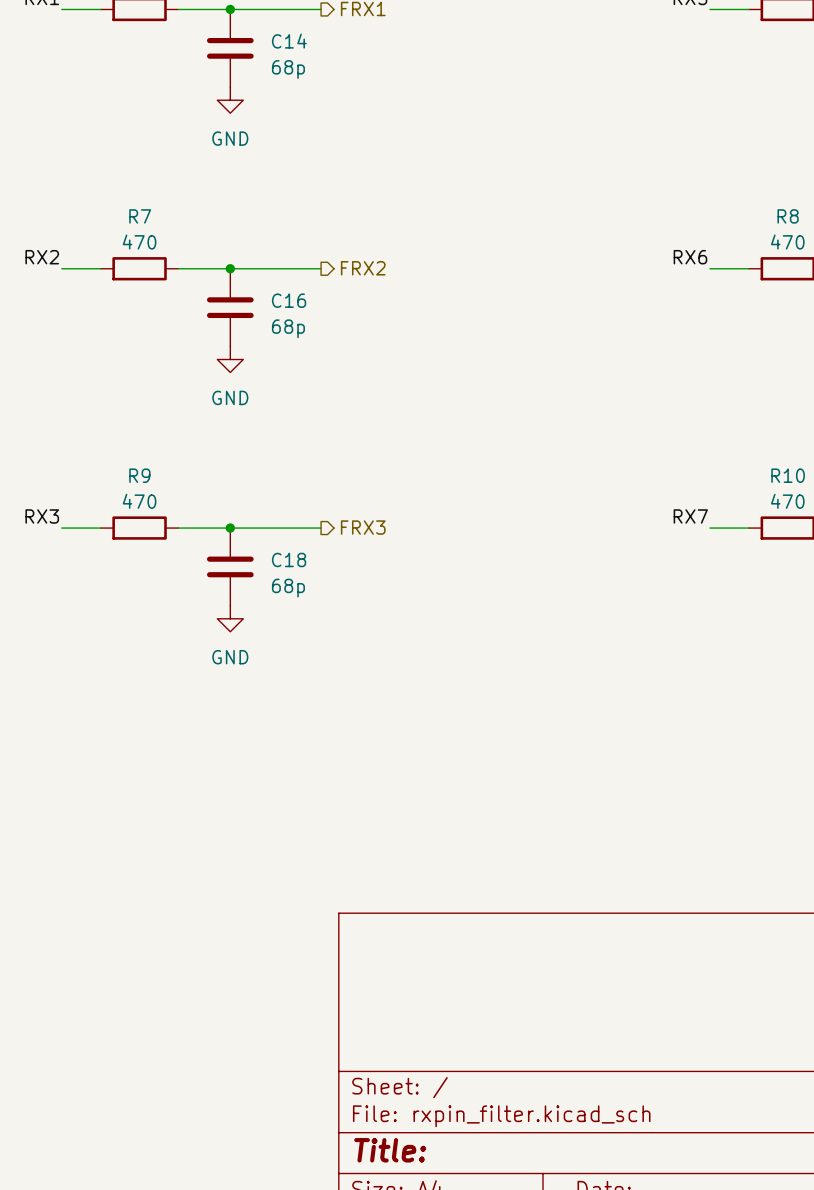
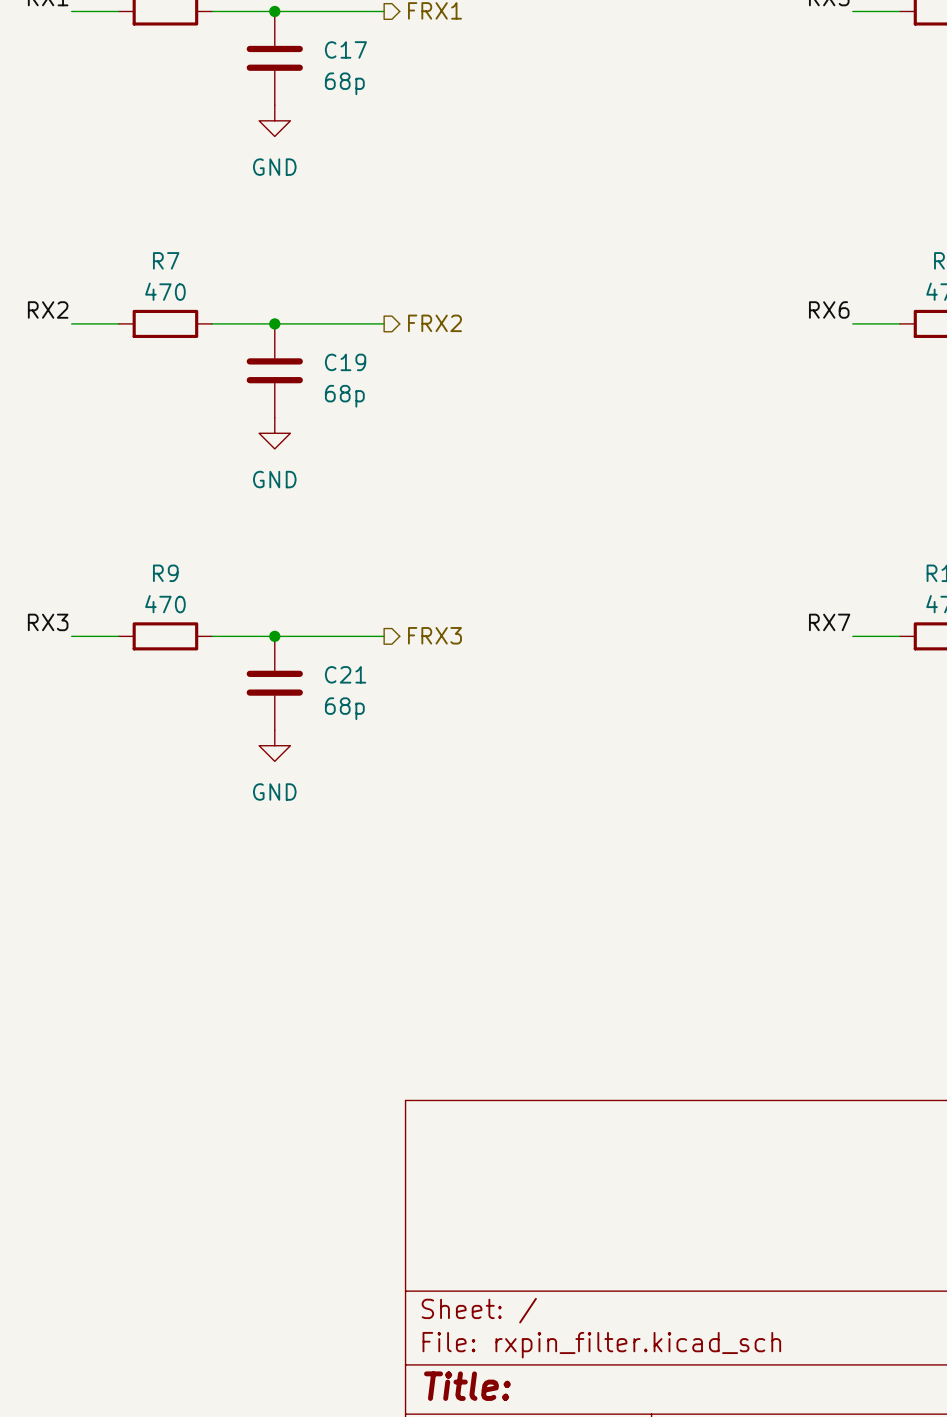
C14 name: C14 (289, 41) -> C17 (345, 49)
C16 name: C16 (289, 300) -> C19 (345, 362)
C18 name: C18 (289, 559) -> C21 (345, 674)

